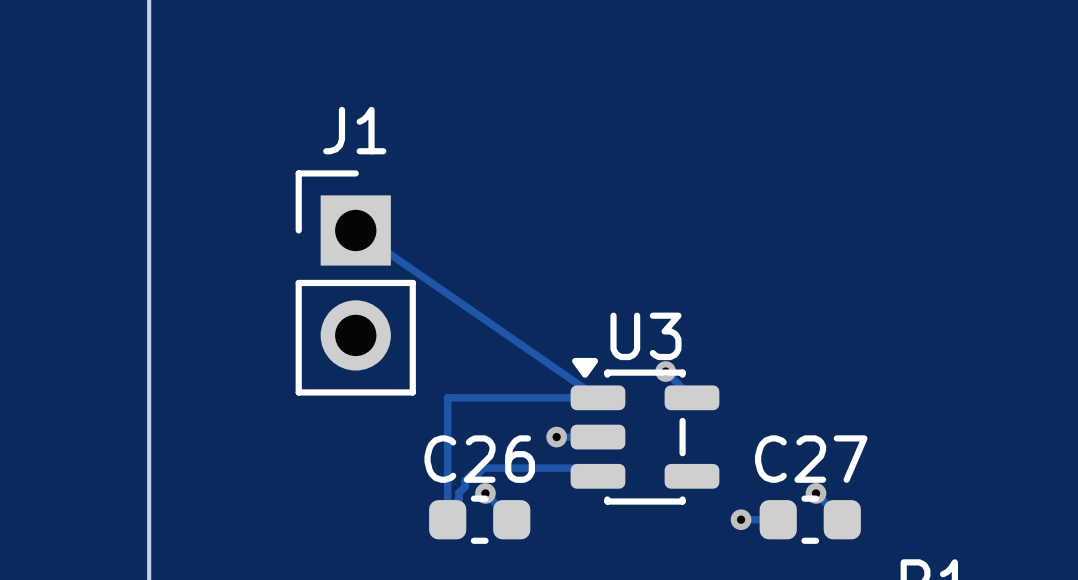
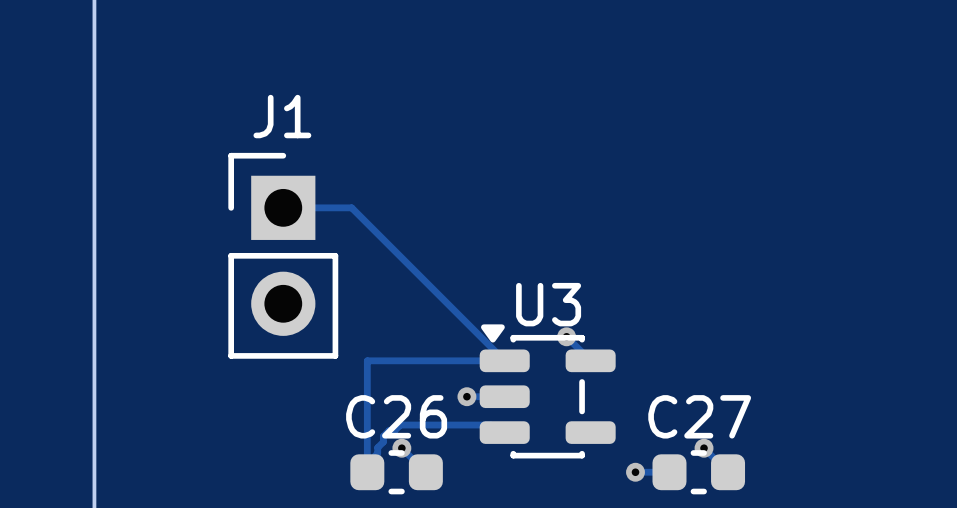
track: (355, 230) (597, 397) -> (283, 207) (351, 207) (504, 360)

